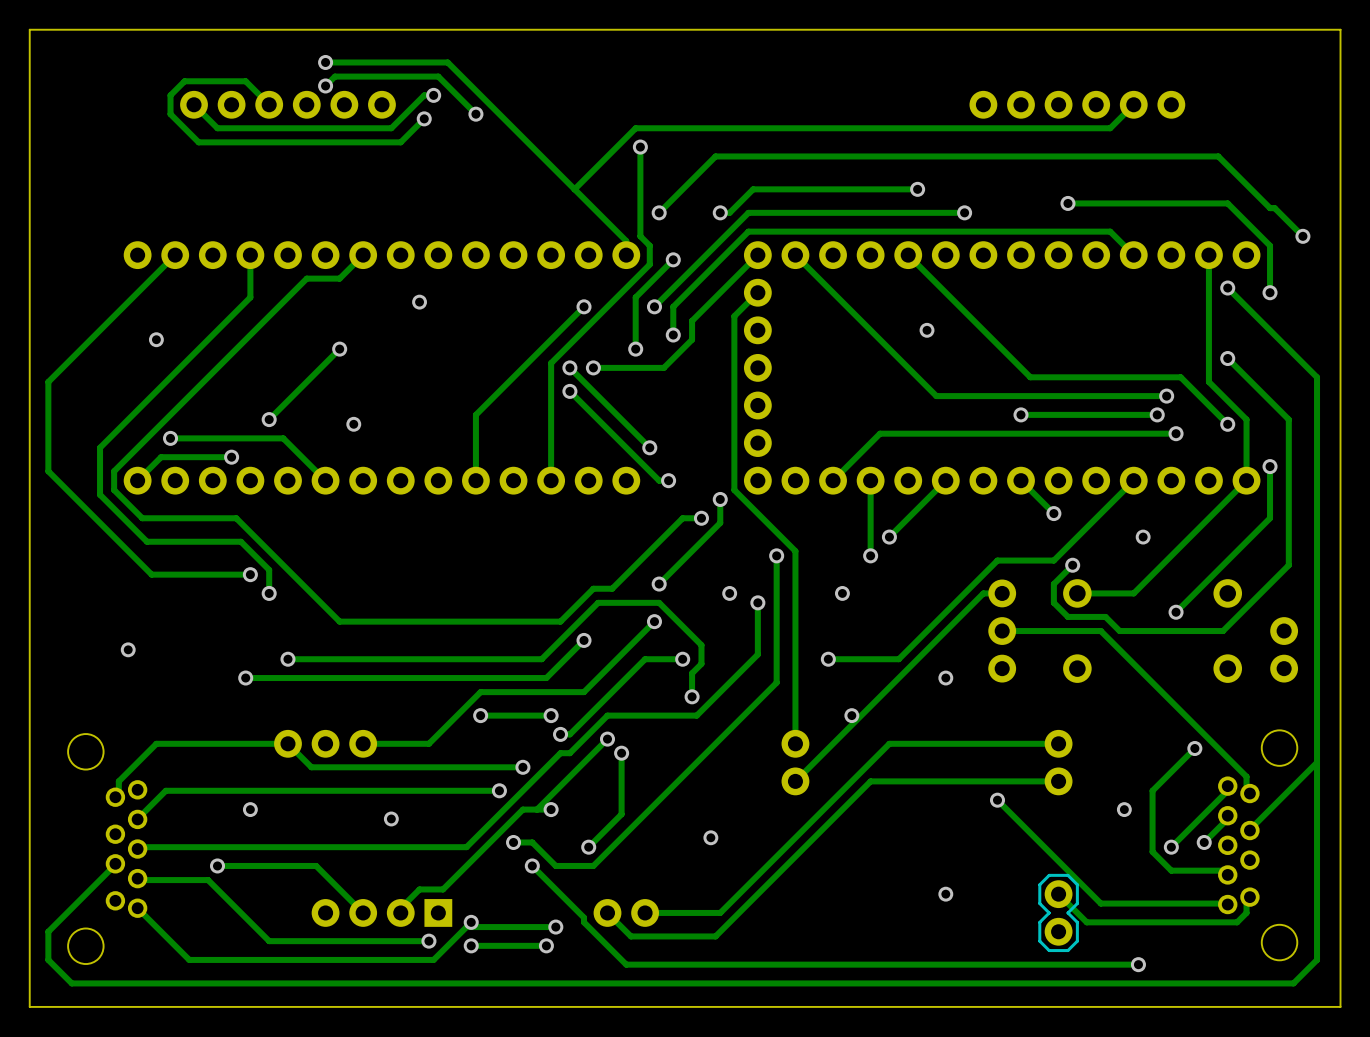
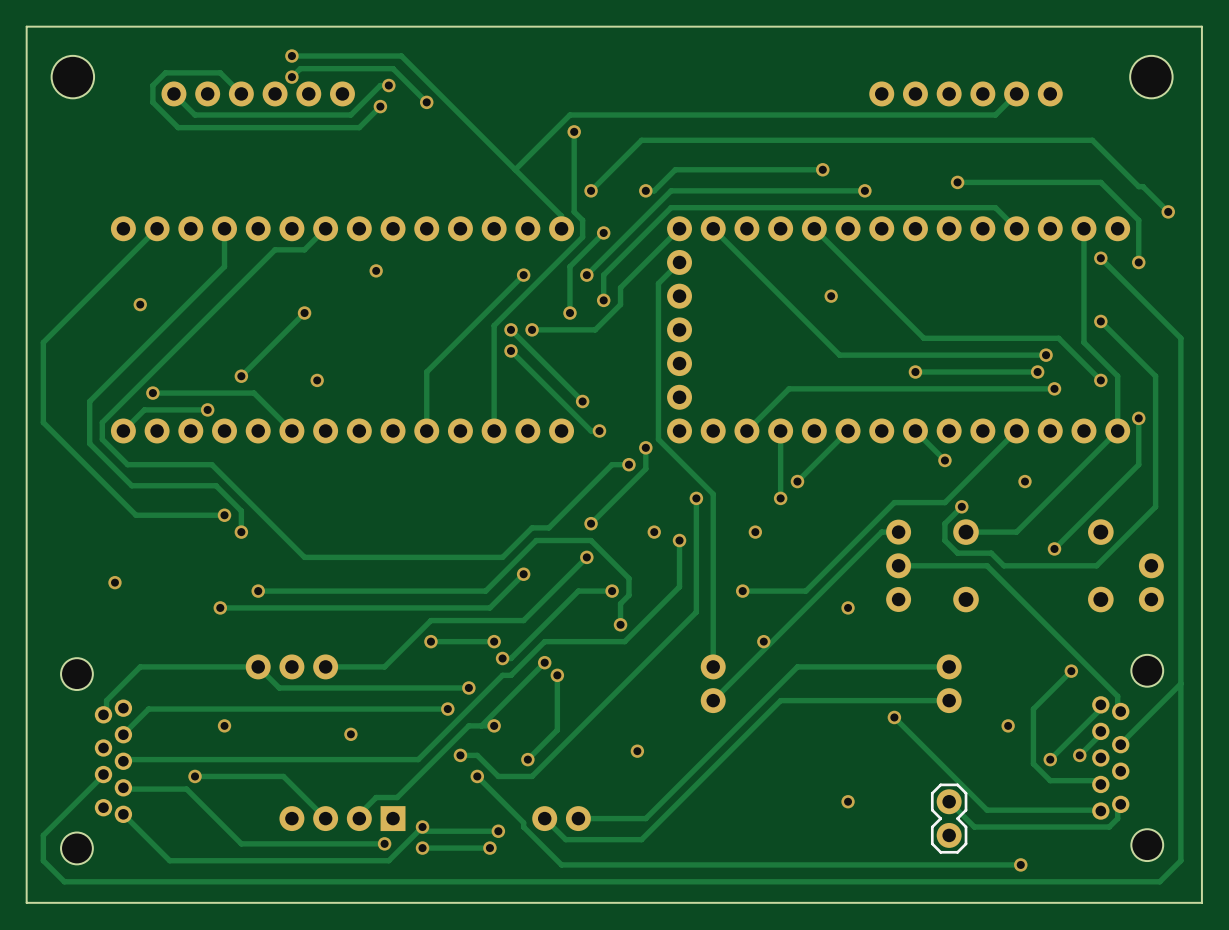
hole: none -> (72, 77)
hole: none -> (1151, 77)

